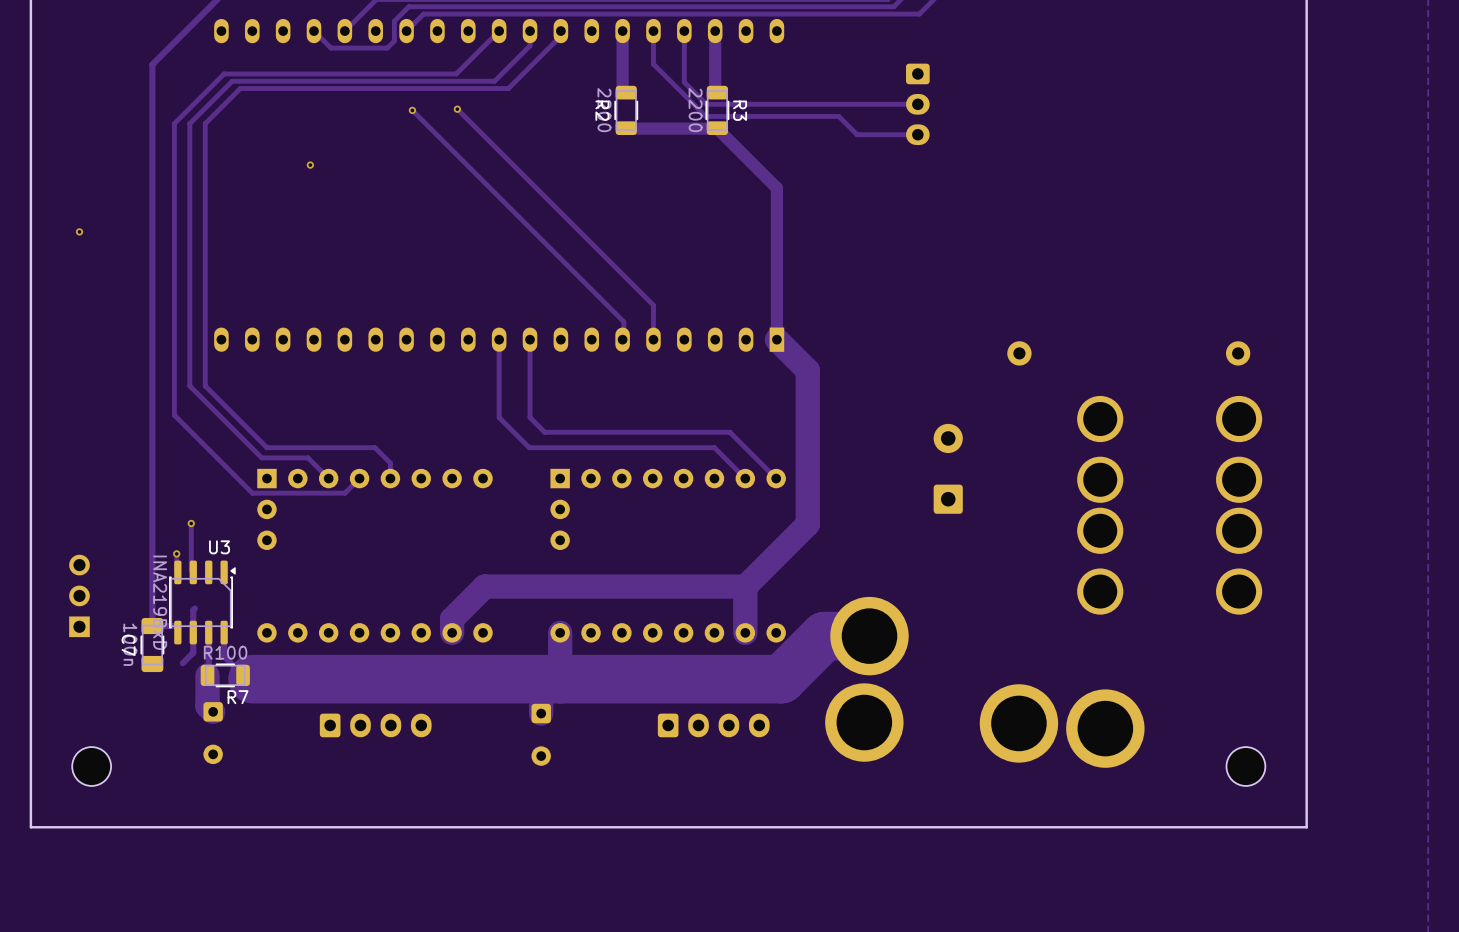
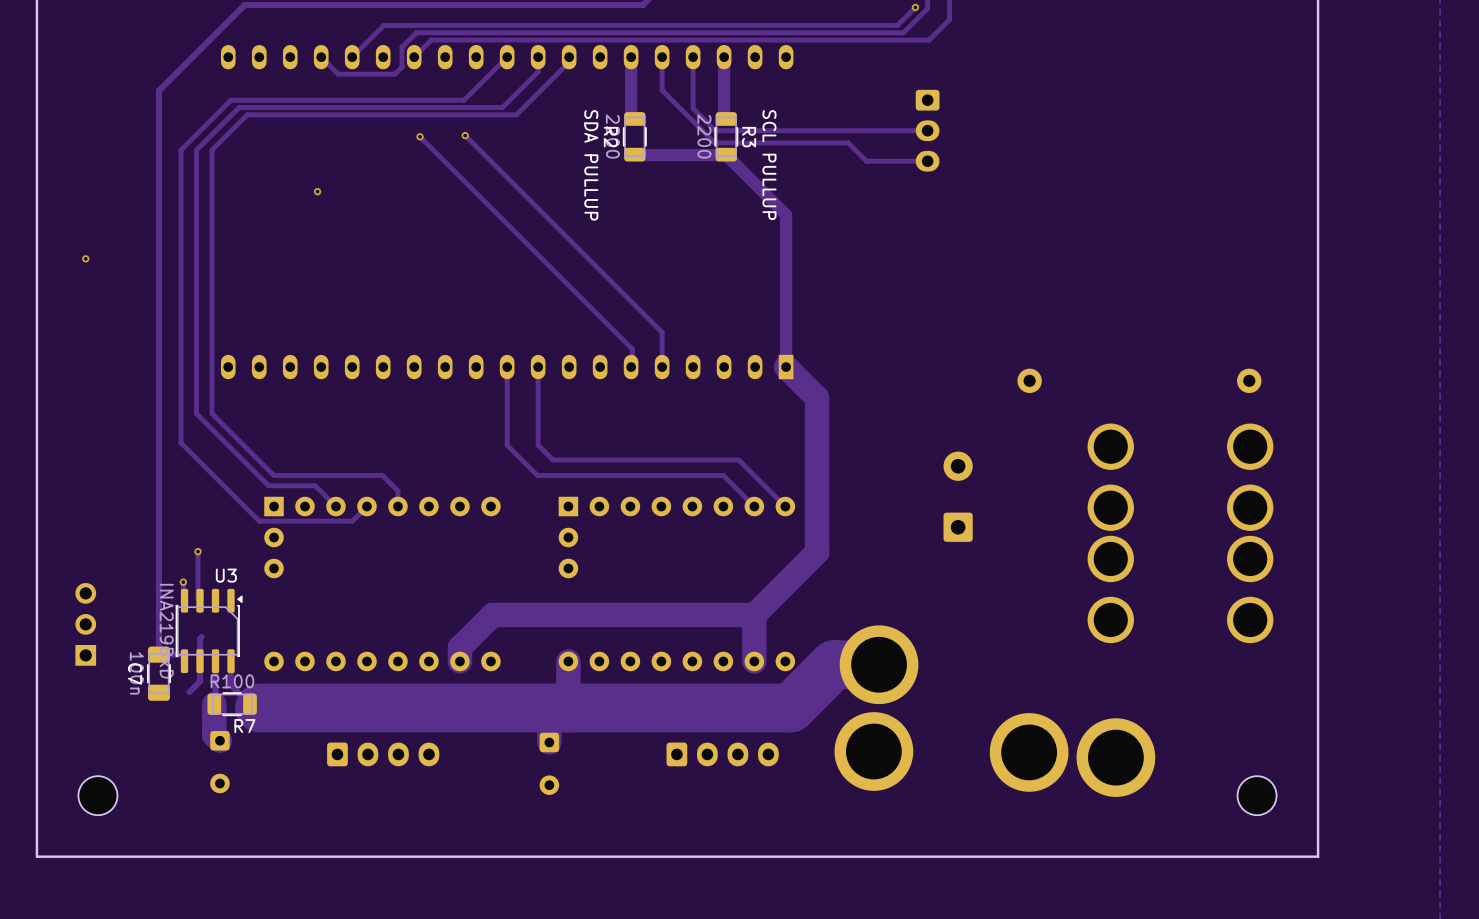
R2 text: none -> SDA PULLUP (591, 165)
R3 text: none -> SCL PULLUP (769, 165)

